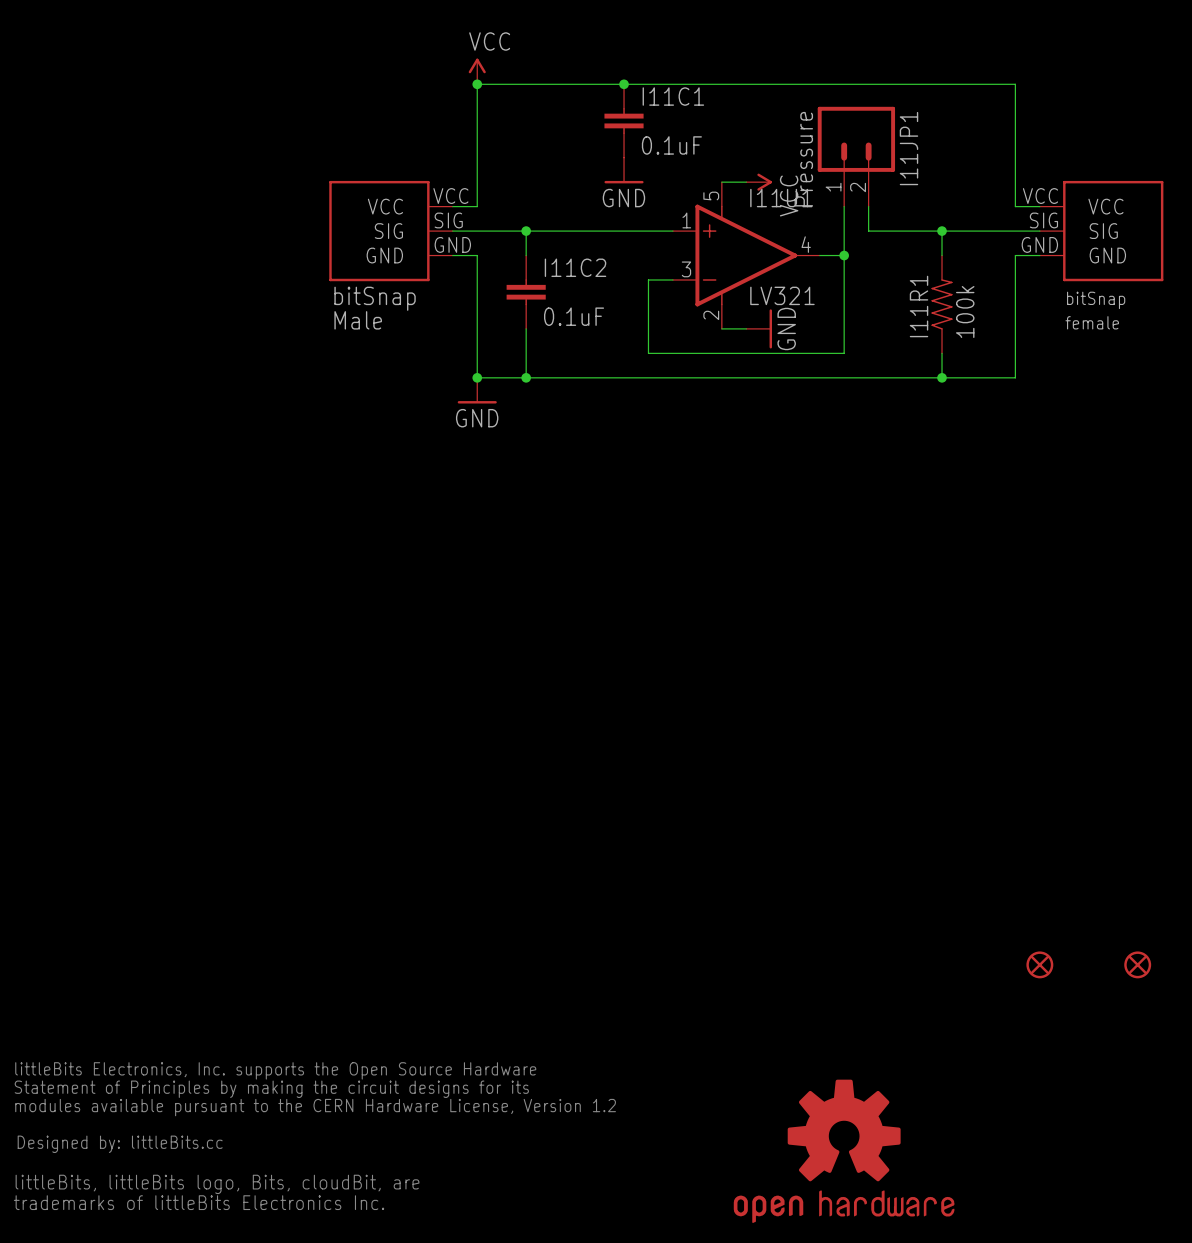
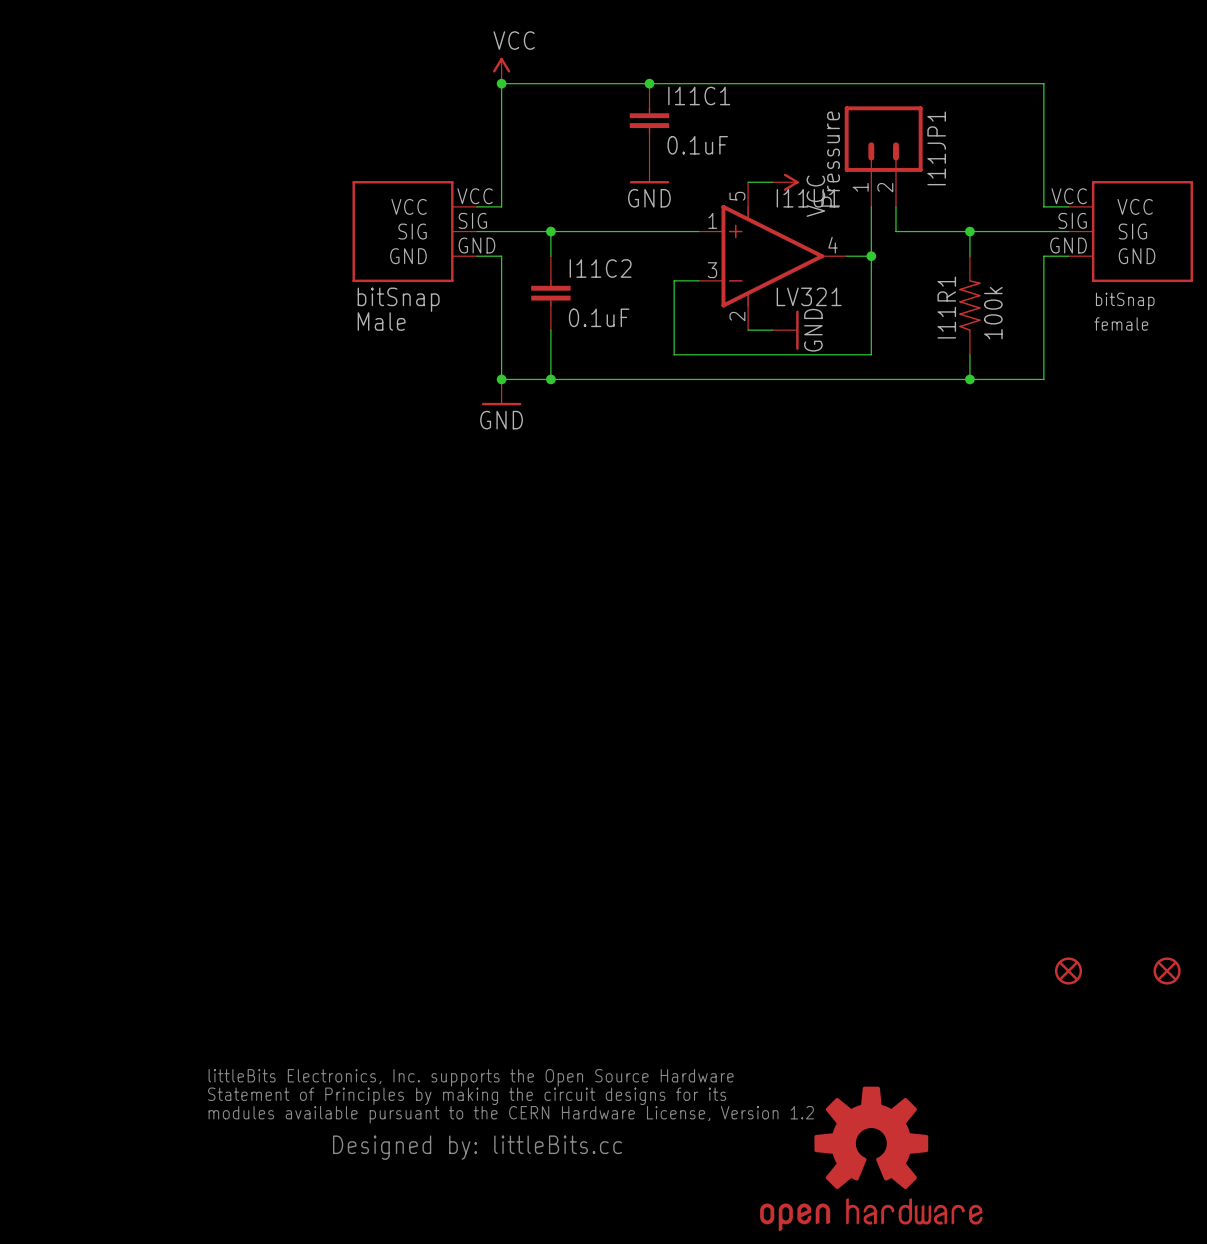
part: none -> (510, 1114)
part: (314, 1136) -> none

